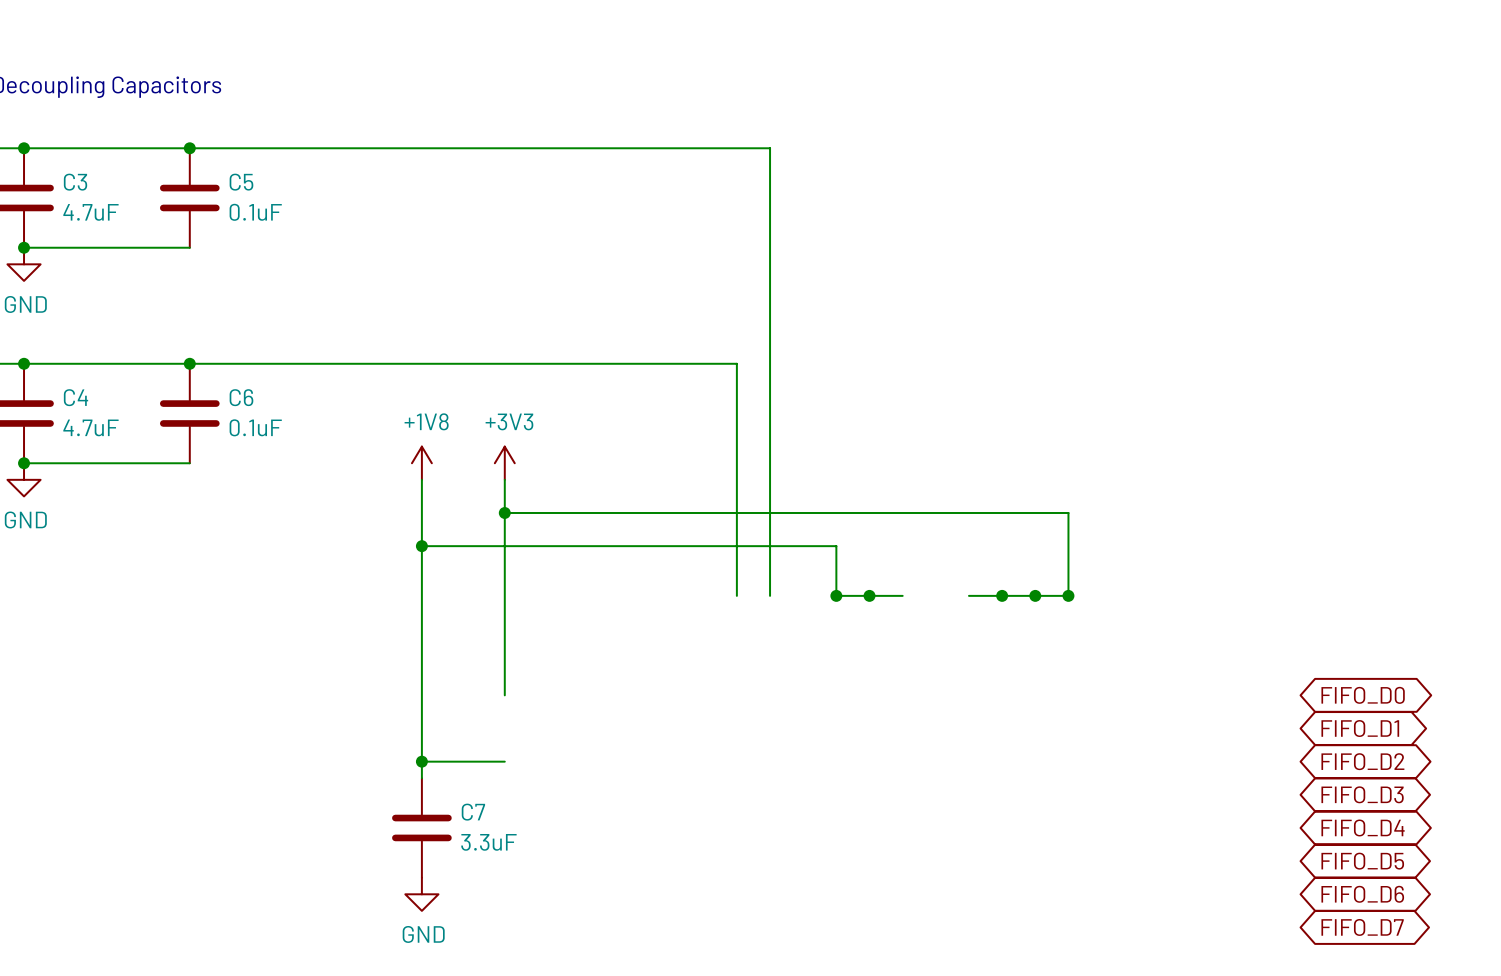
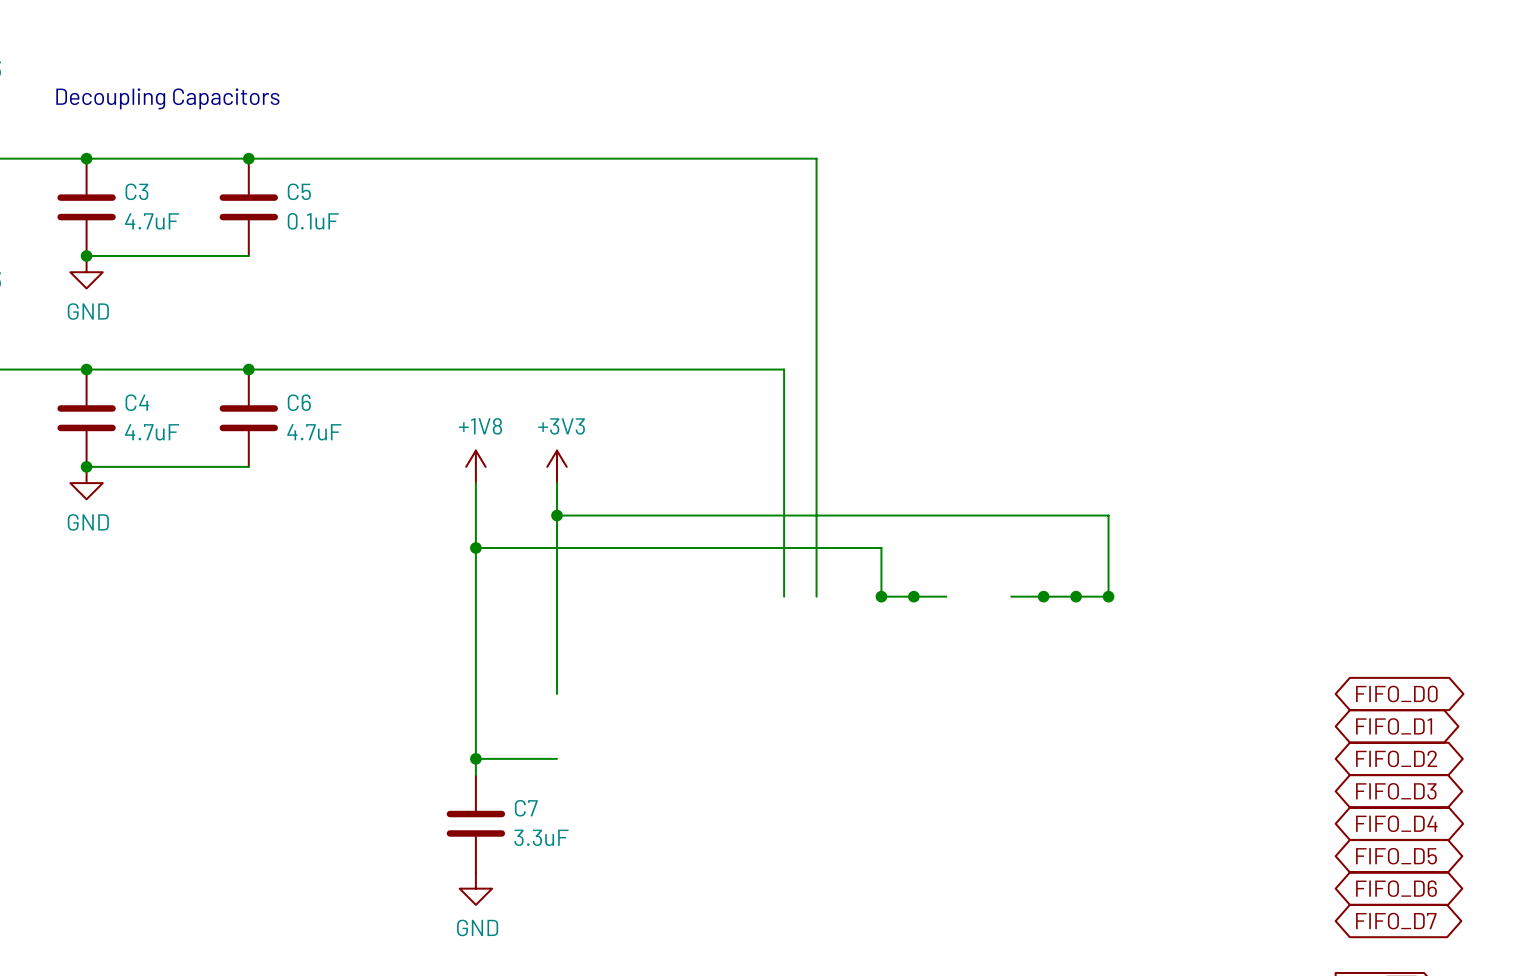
C6 value: 0.1uF (255, 427) -> 4.7uF (314, 432)

